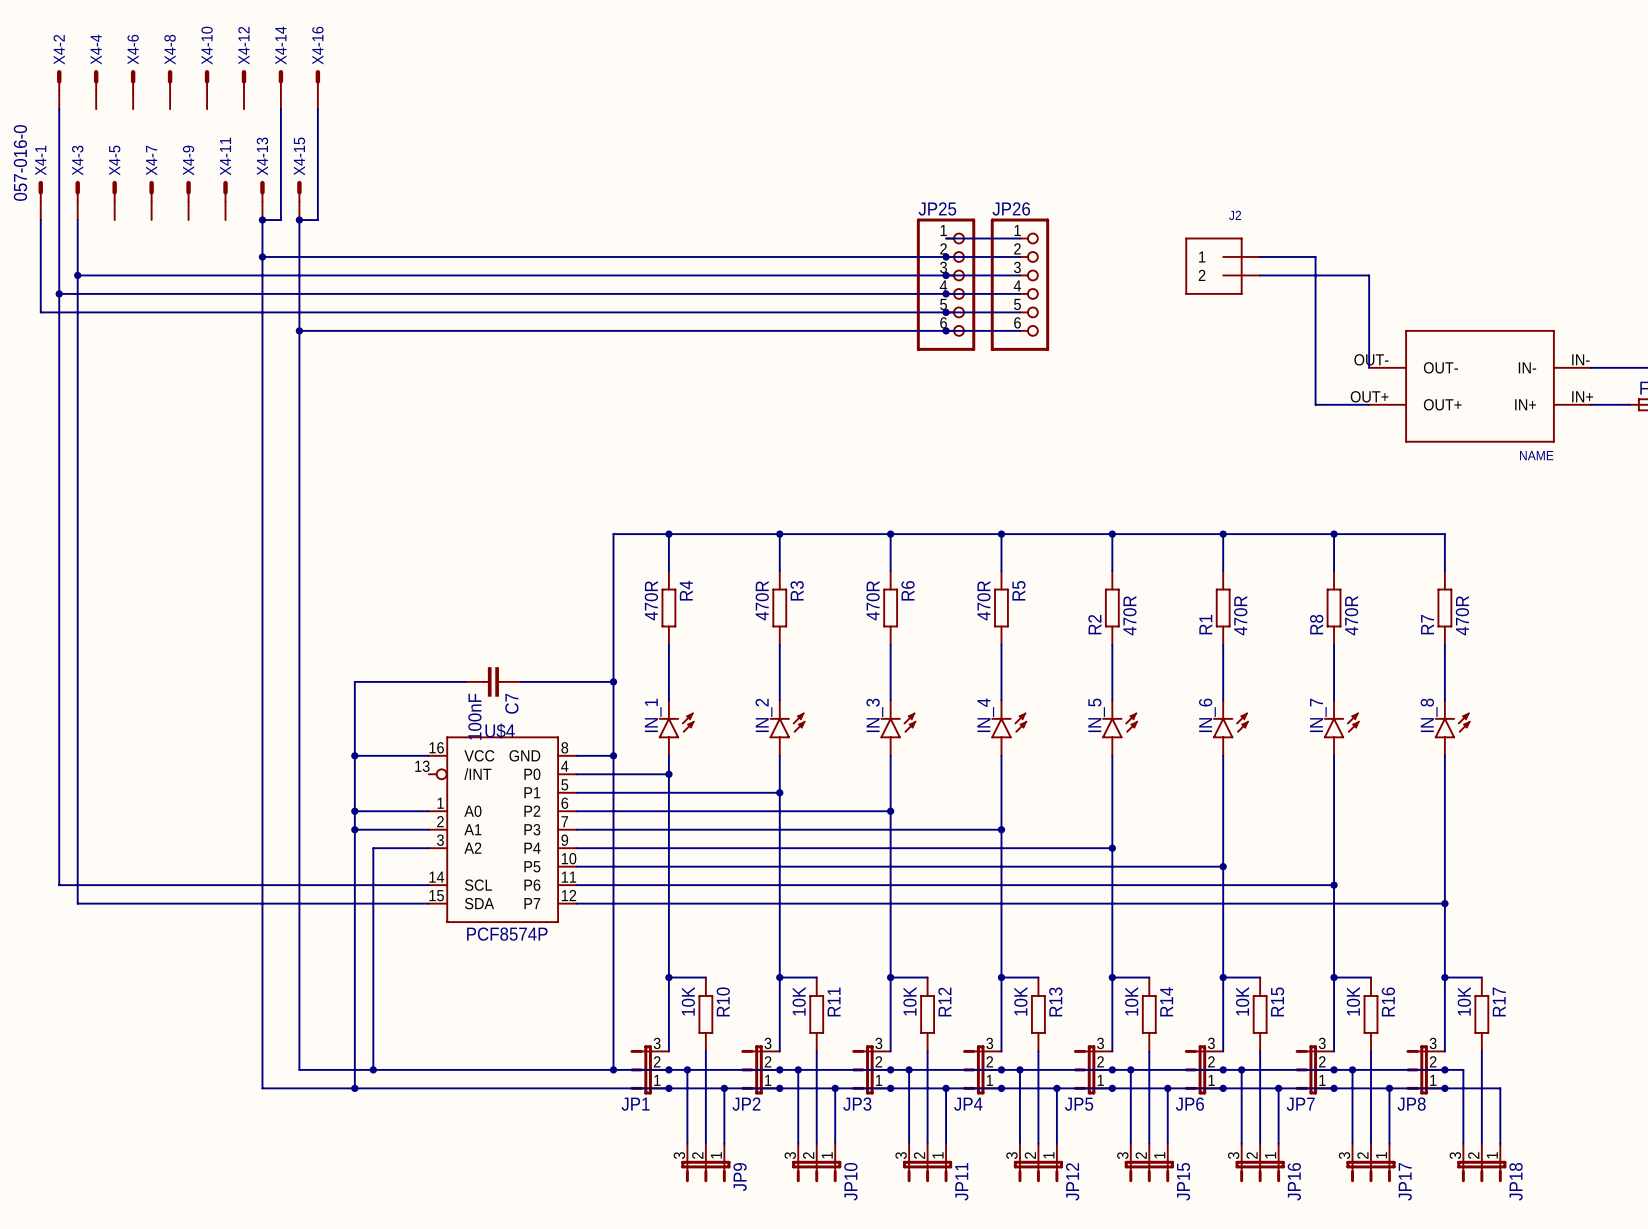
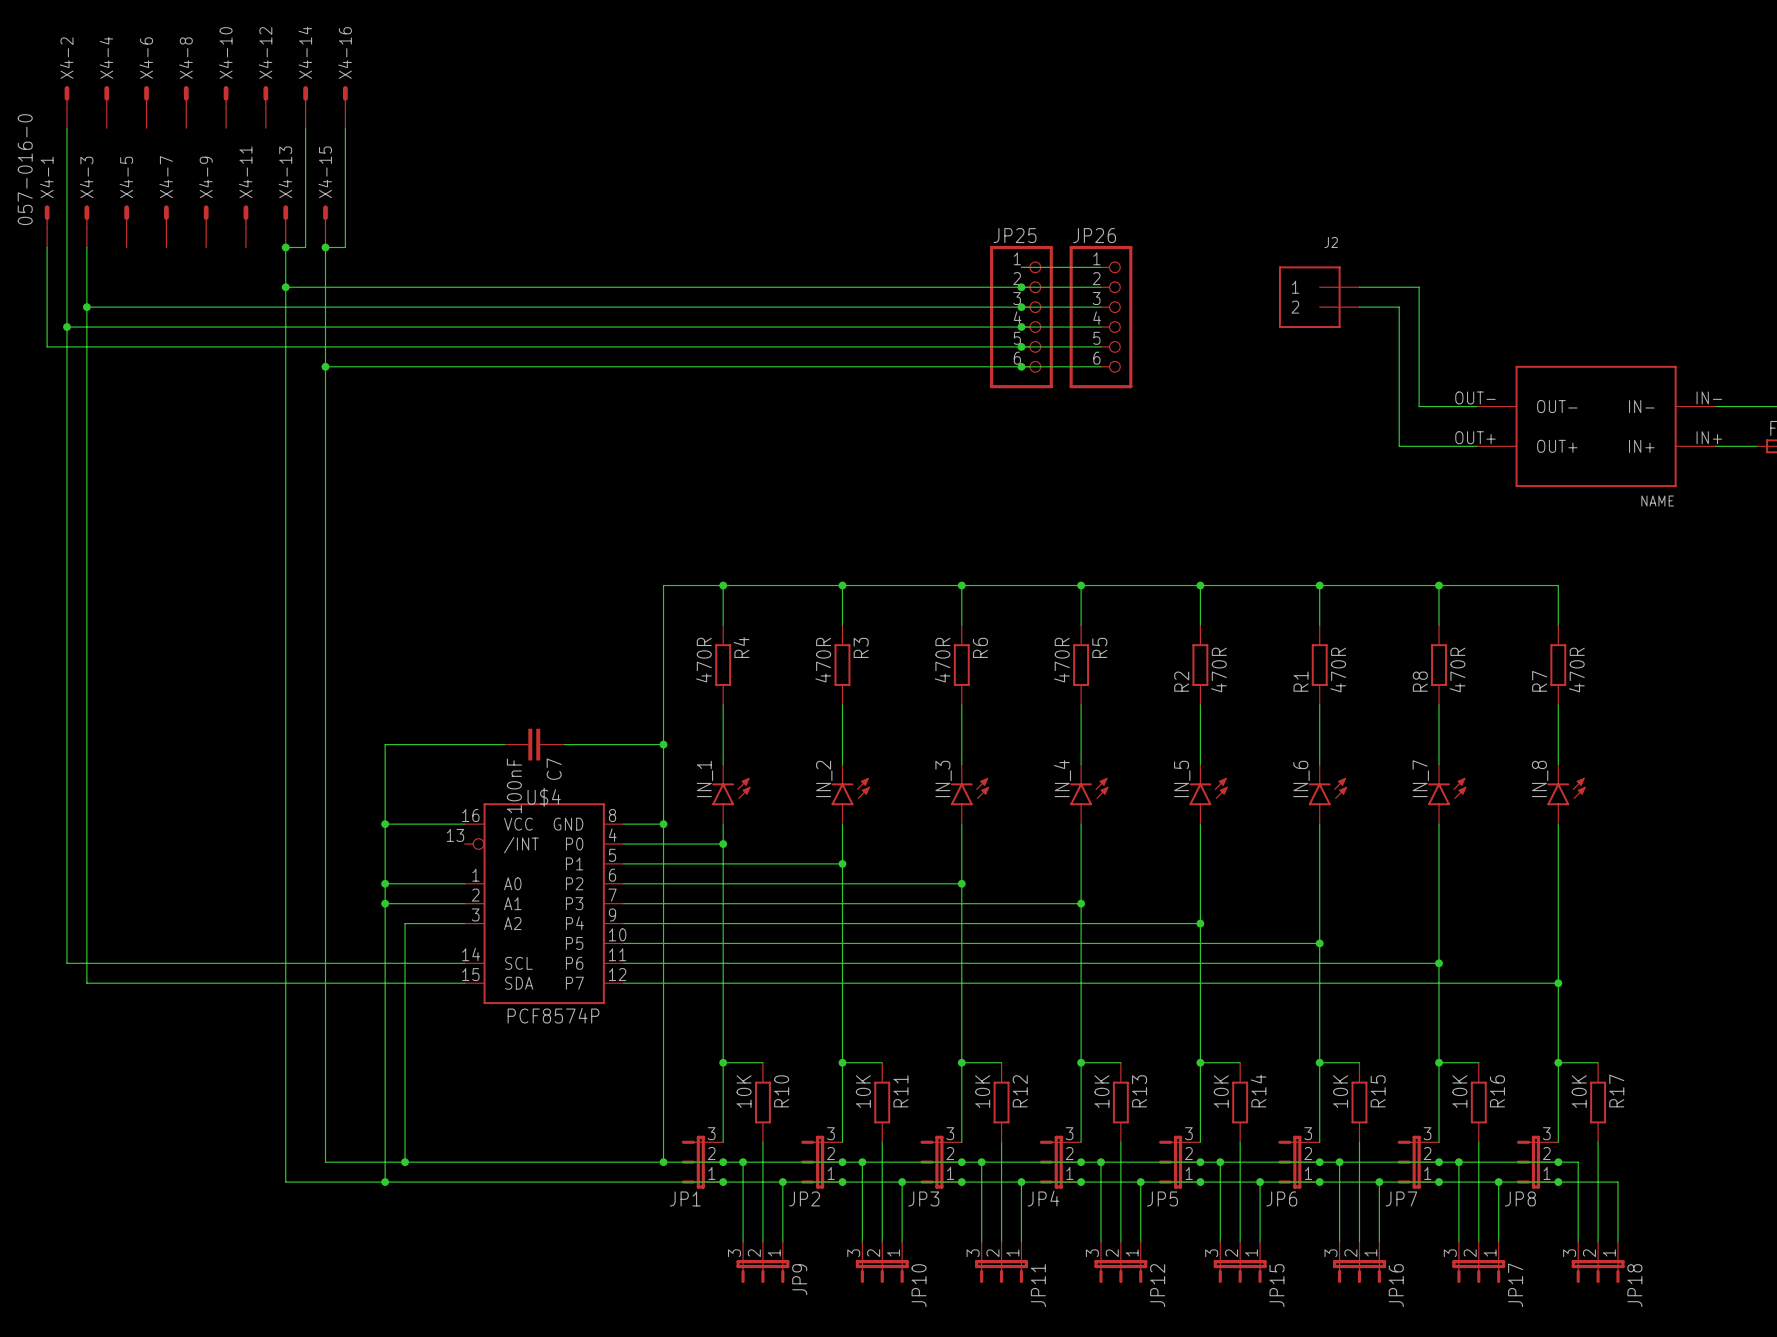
wire: (1297, 275) (1369, 275) (1369, 367) -> (1399, 307) (1399, 446) (1419, 446)
wire: (1315, 367) (1315, 404) -> (1419, 406) (1476, 406)

